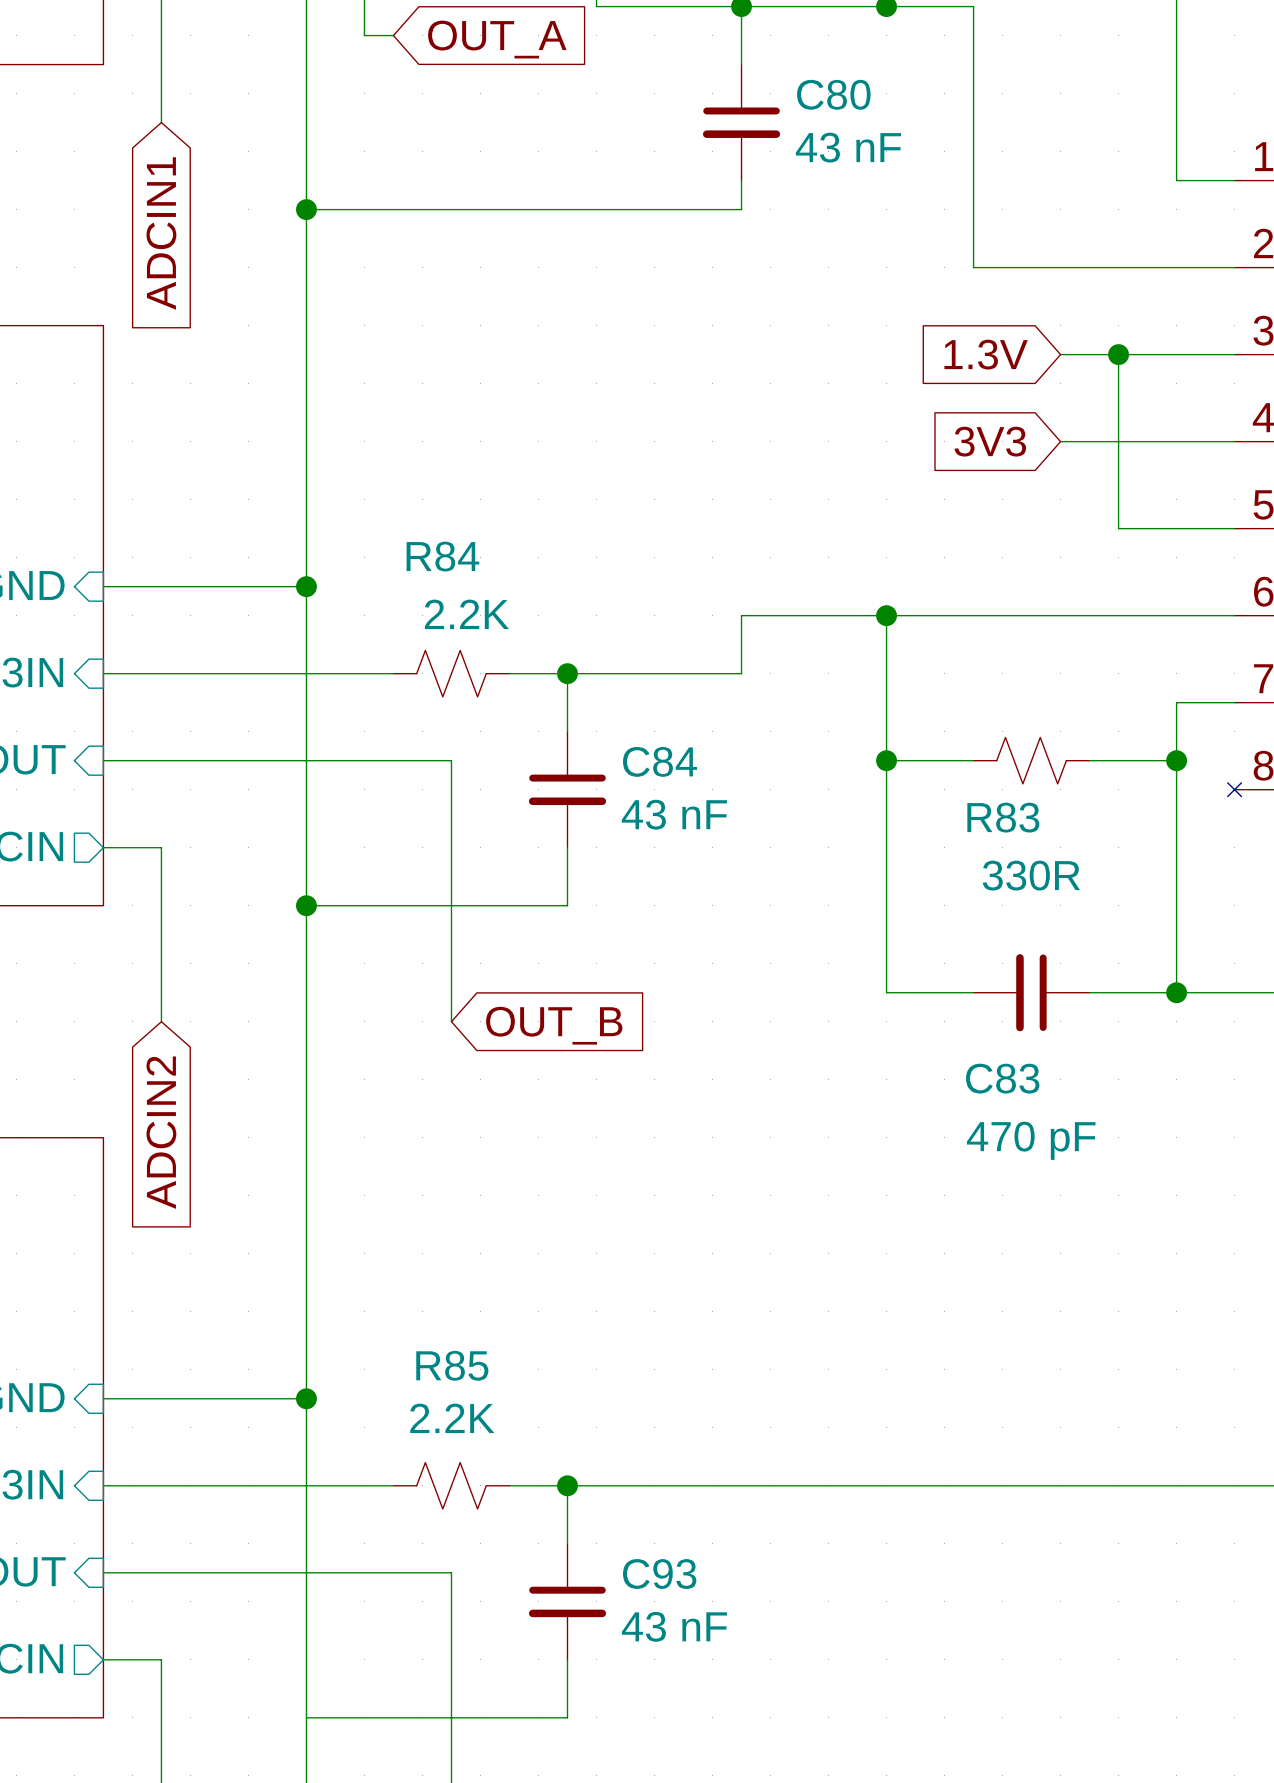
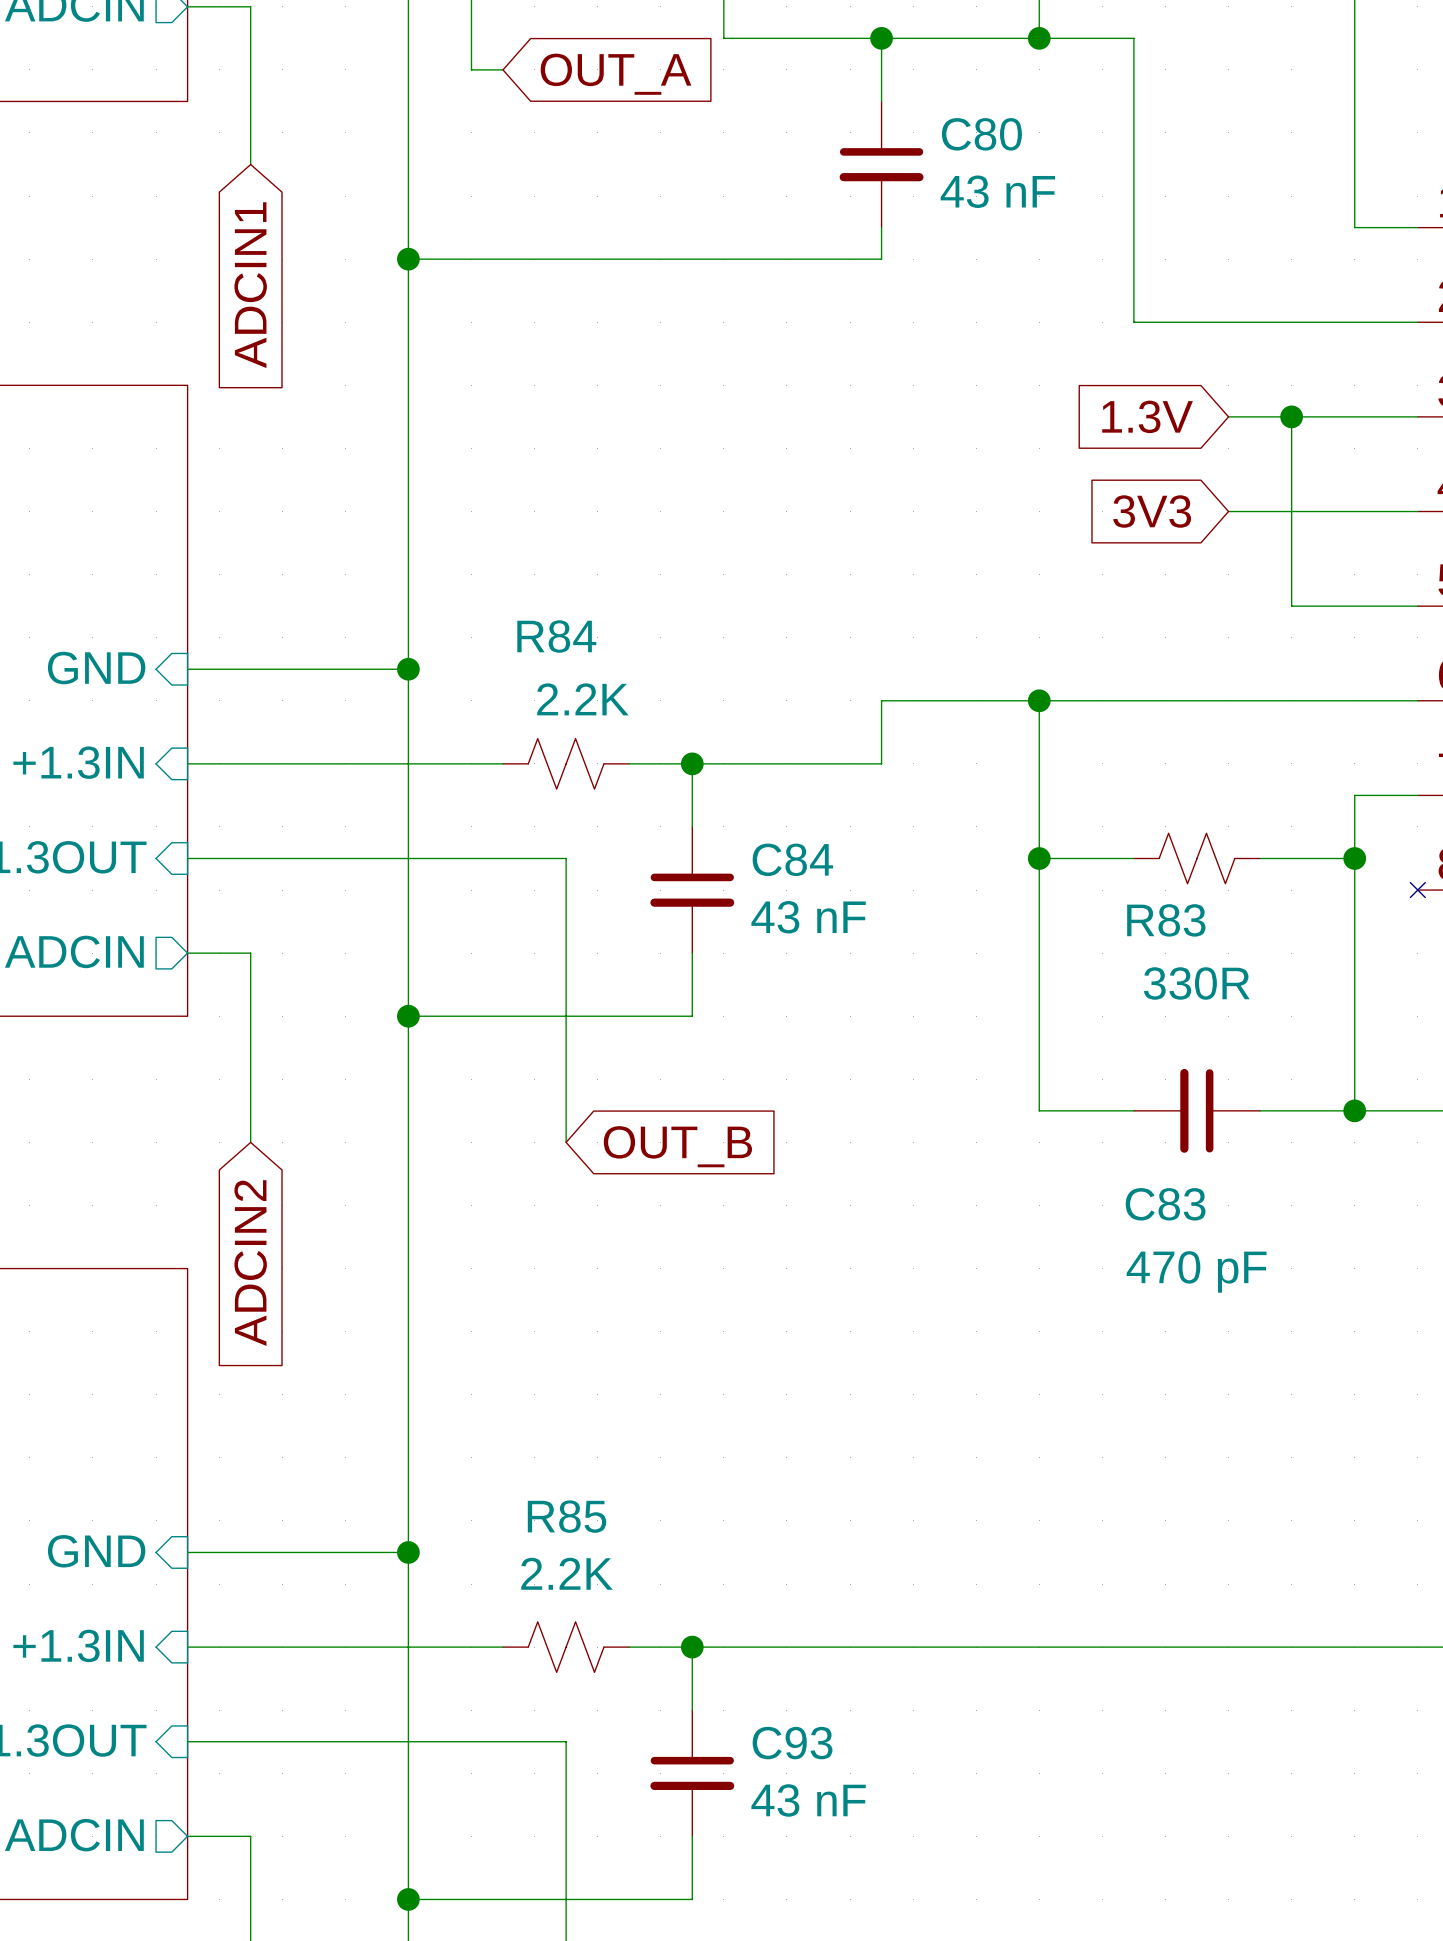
junction: none -> (408, 1899)

